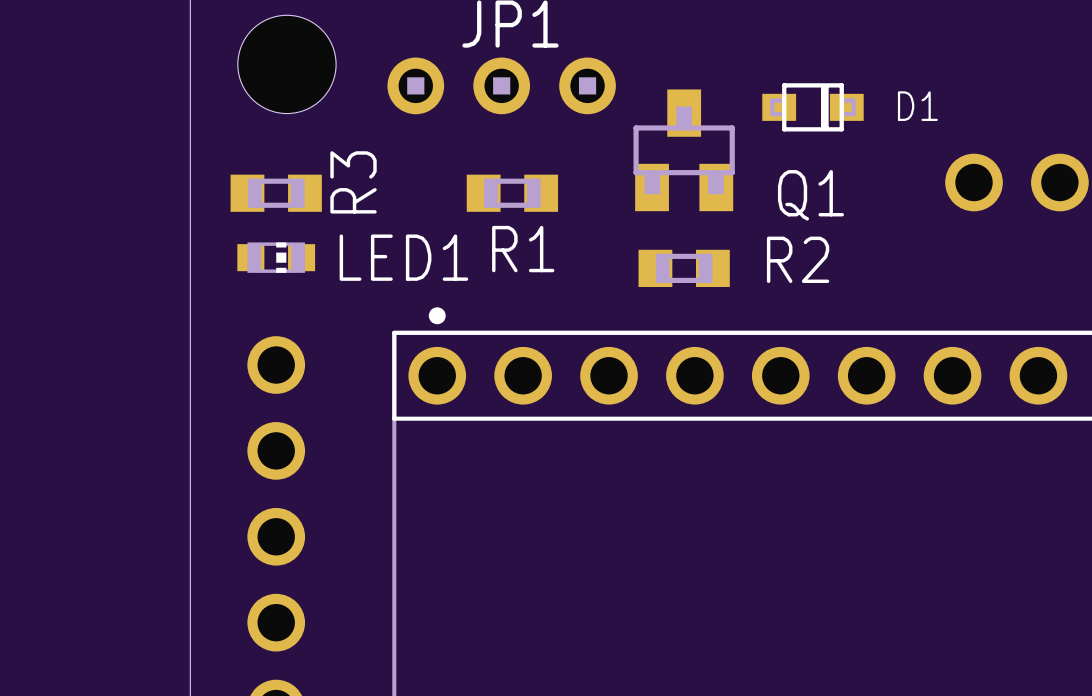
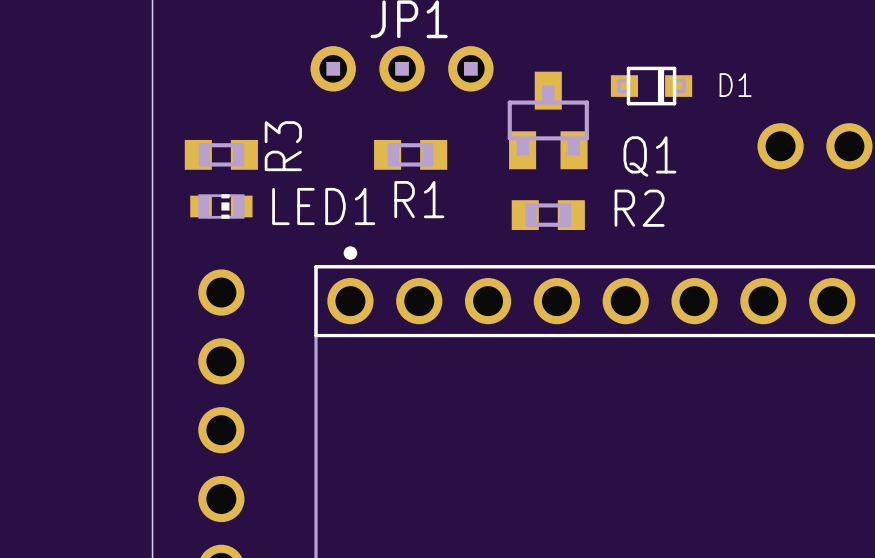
hole: (286, 64) -> none

